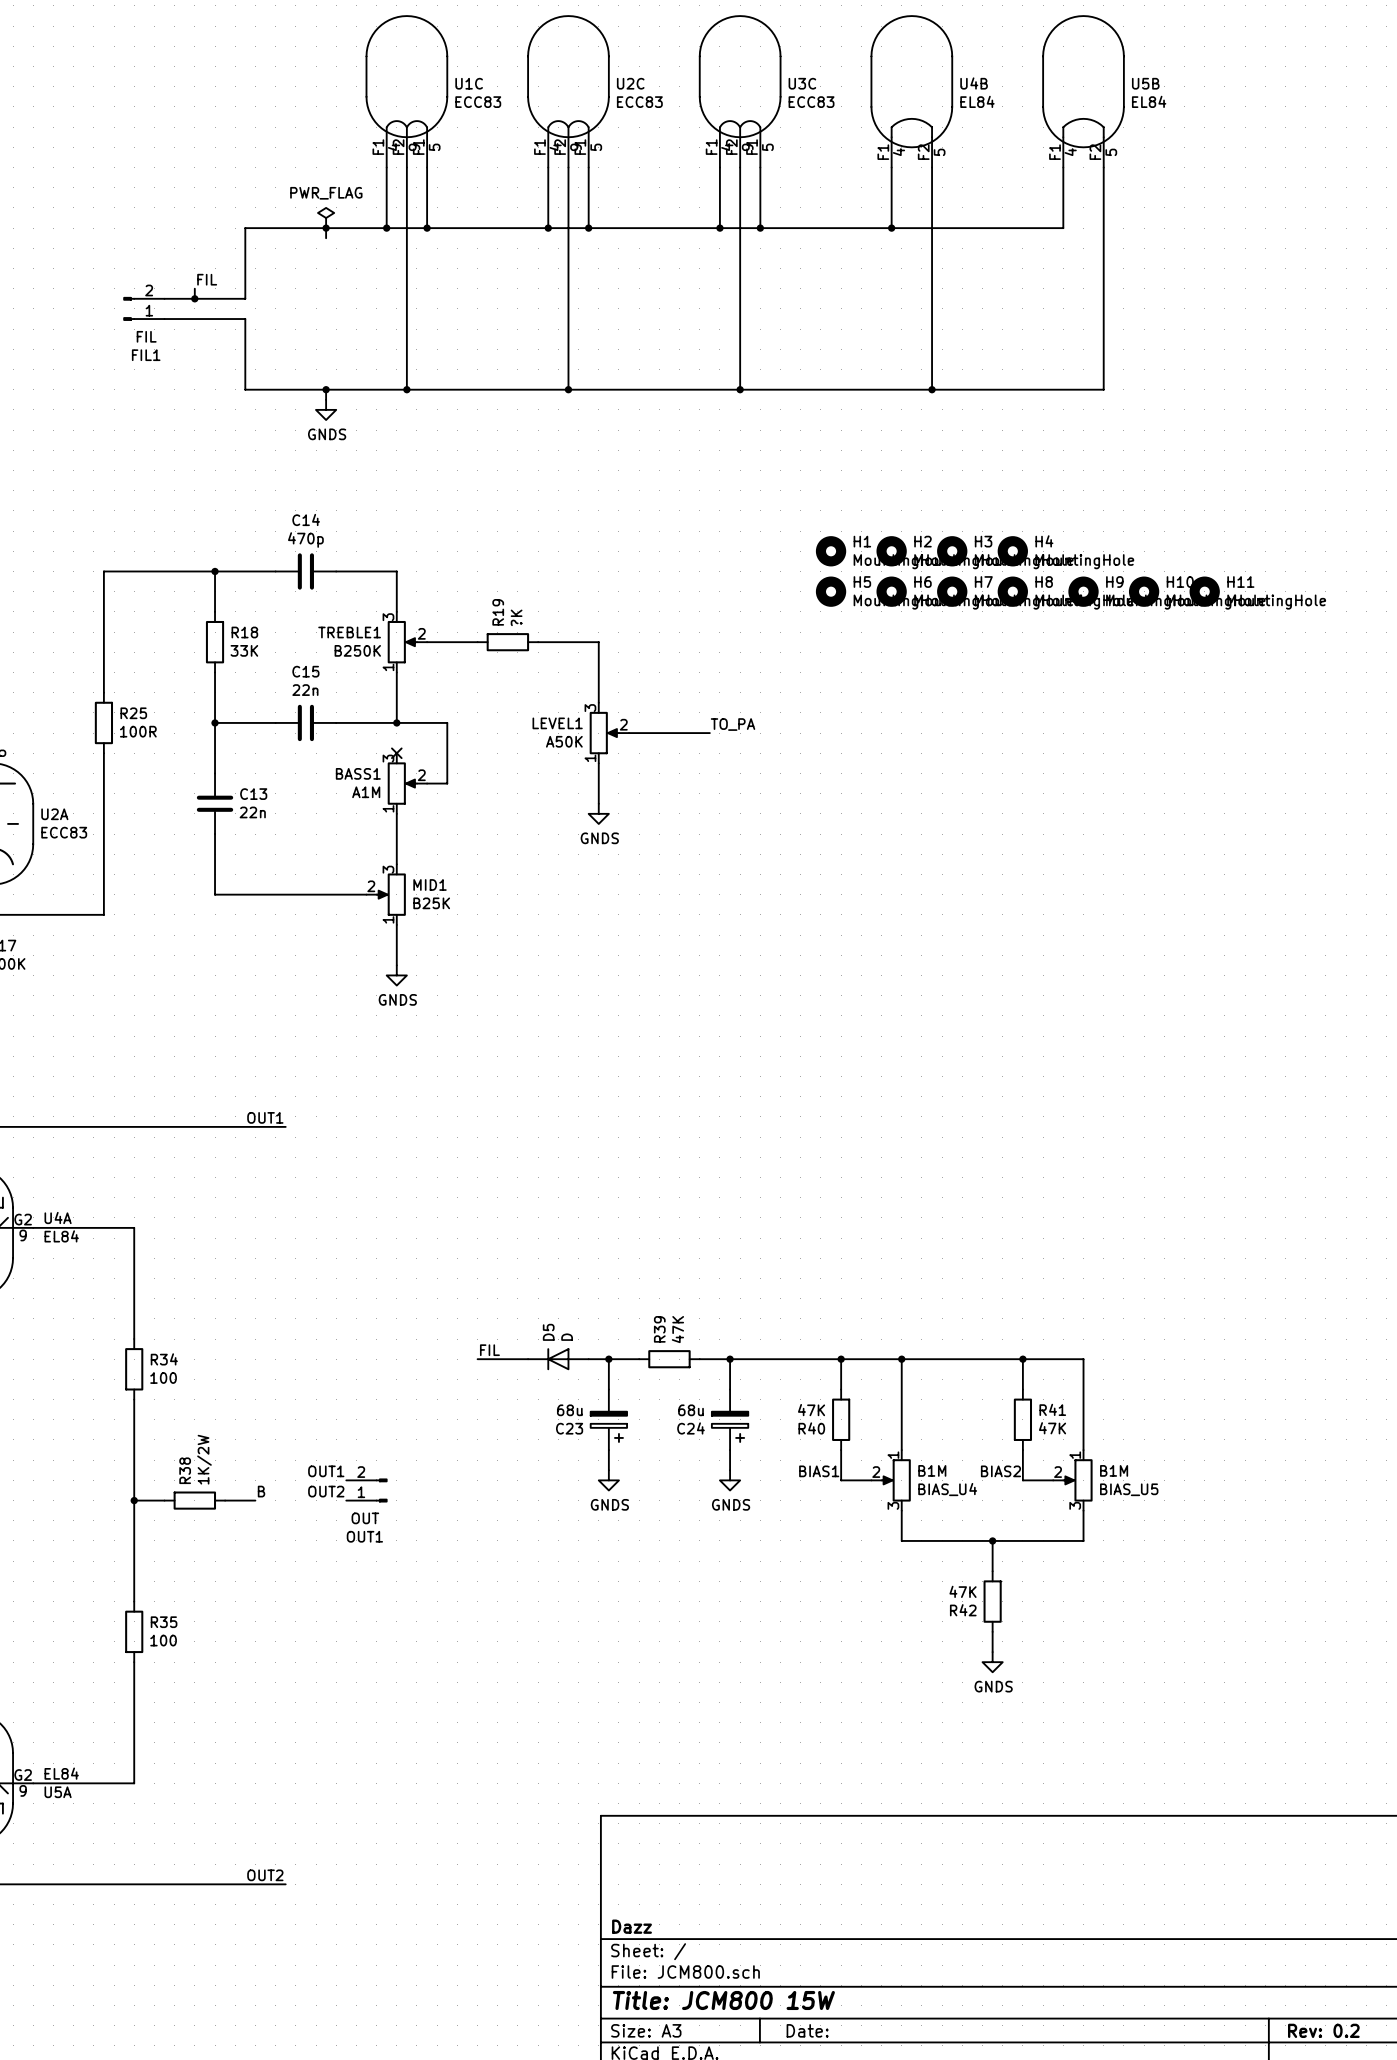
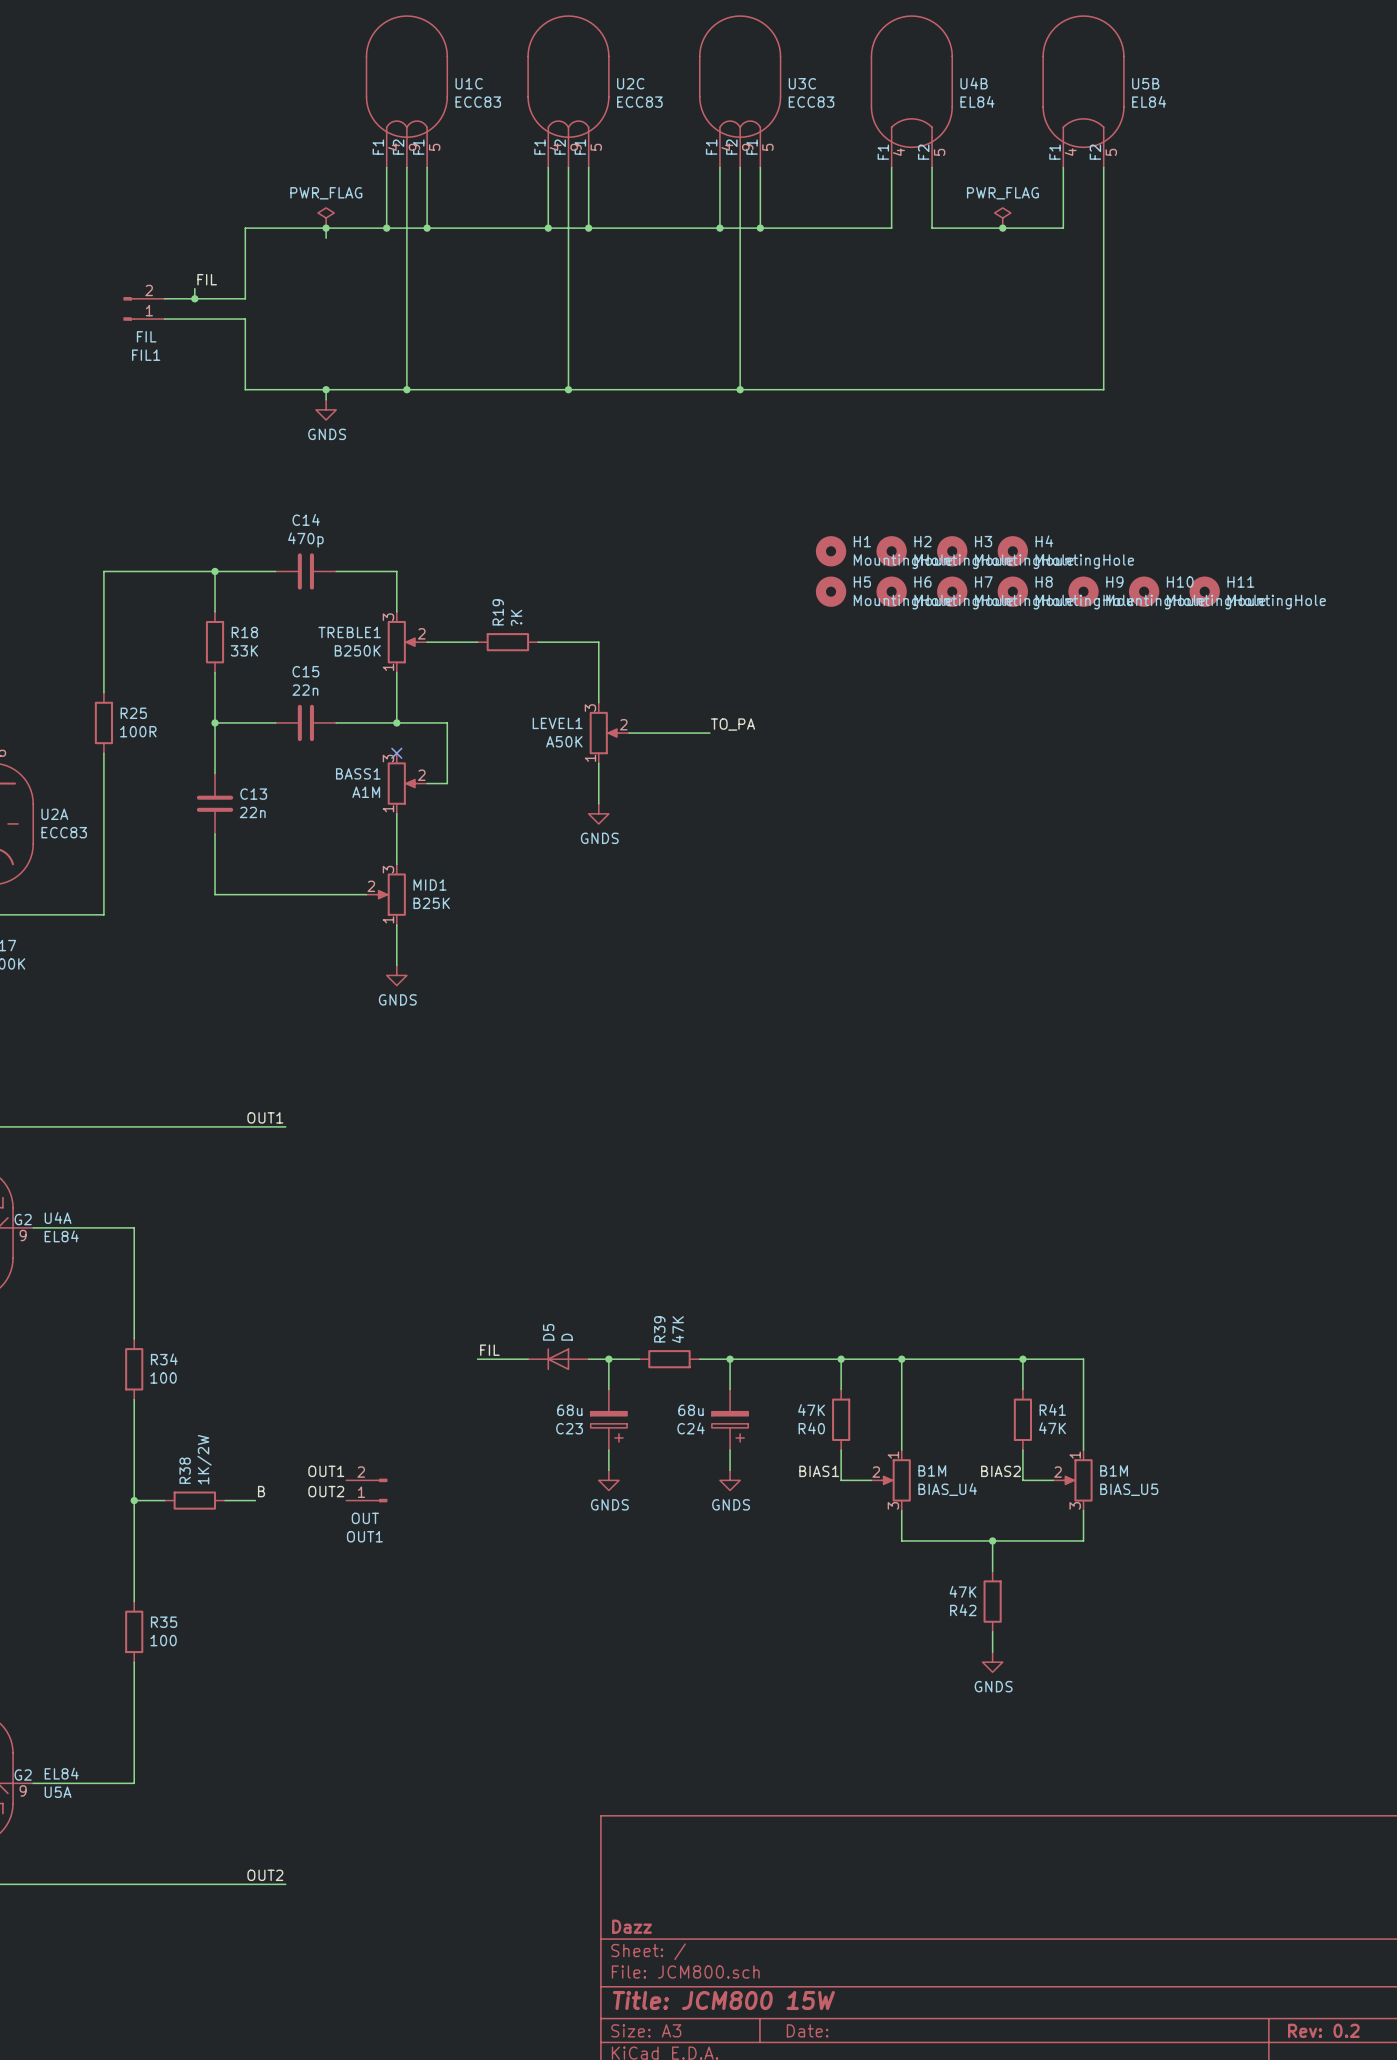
power symbol: none -> PWR_FLAG (1002, 218)
wire: (891, 228) (932, 228) (932, 389) -> none
junction: (891, 228) -> none
junction: none -> (1002, 228)
junction: (932, 389) -> none

